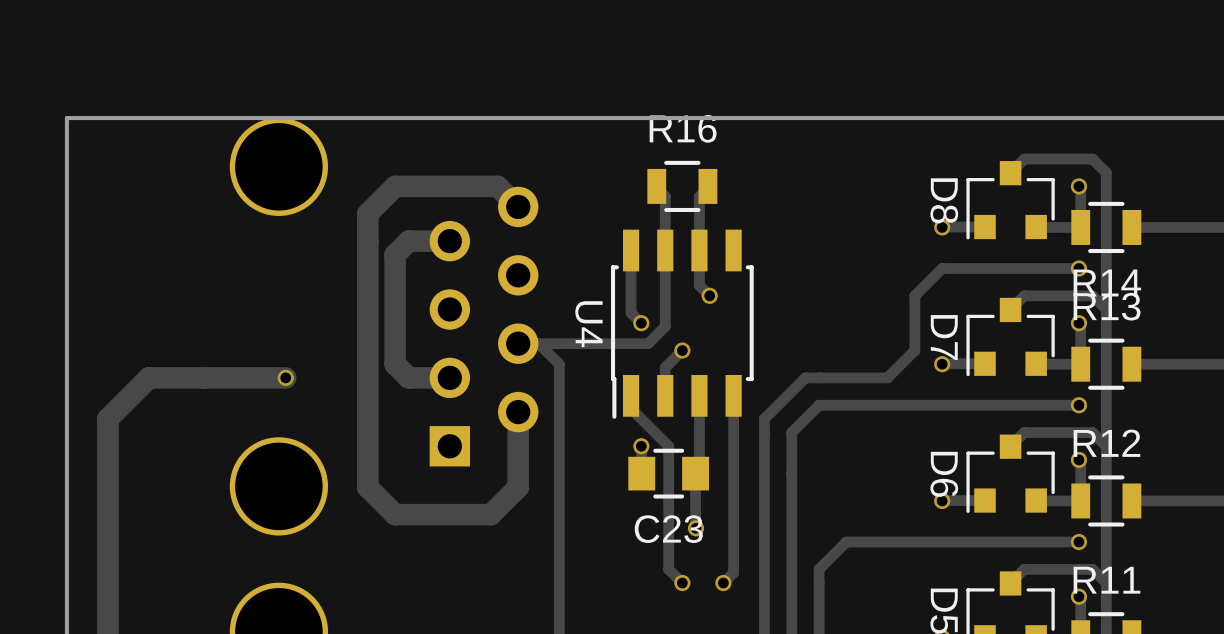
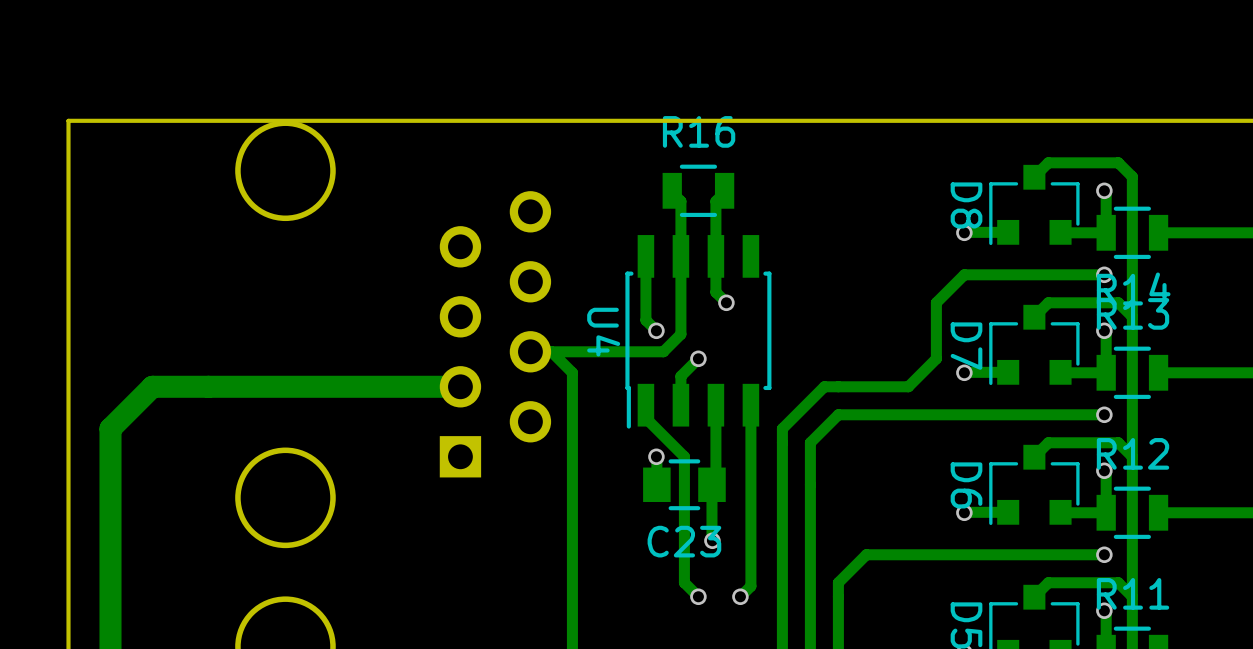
track: (518, 206) (497, 186) (395, 186) (367, 213) (367, 487) (395, 514) (490, 514) (518, 487) (518, 412) -> none
track: (449, 241) (408, 241) (395, 254) (395, 364) (408, 377) -> (292, 386) (418, 386)
via: (285, 377) -> none

